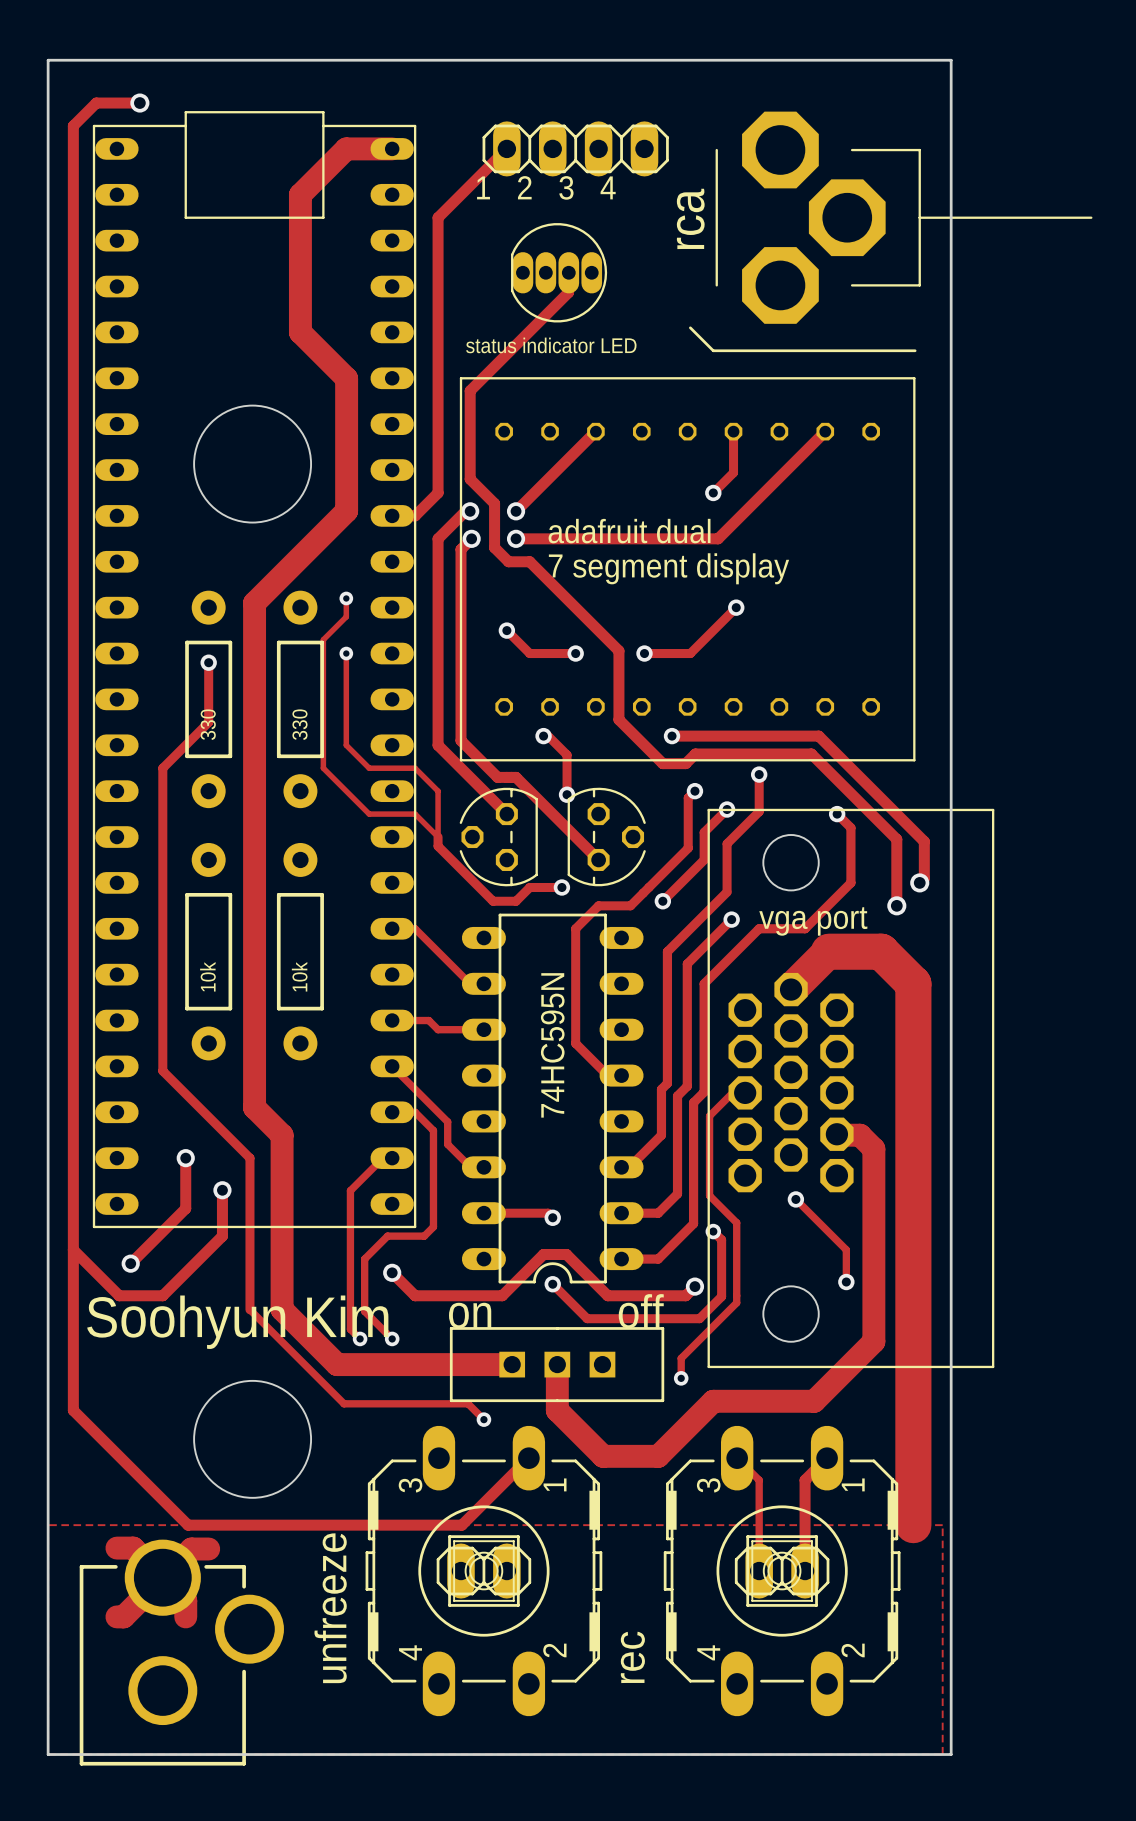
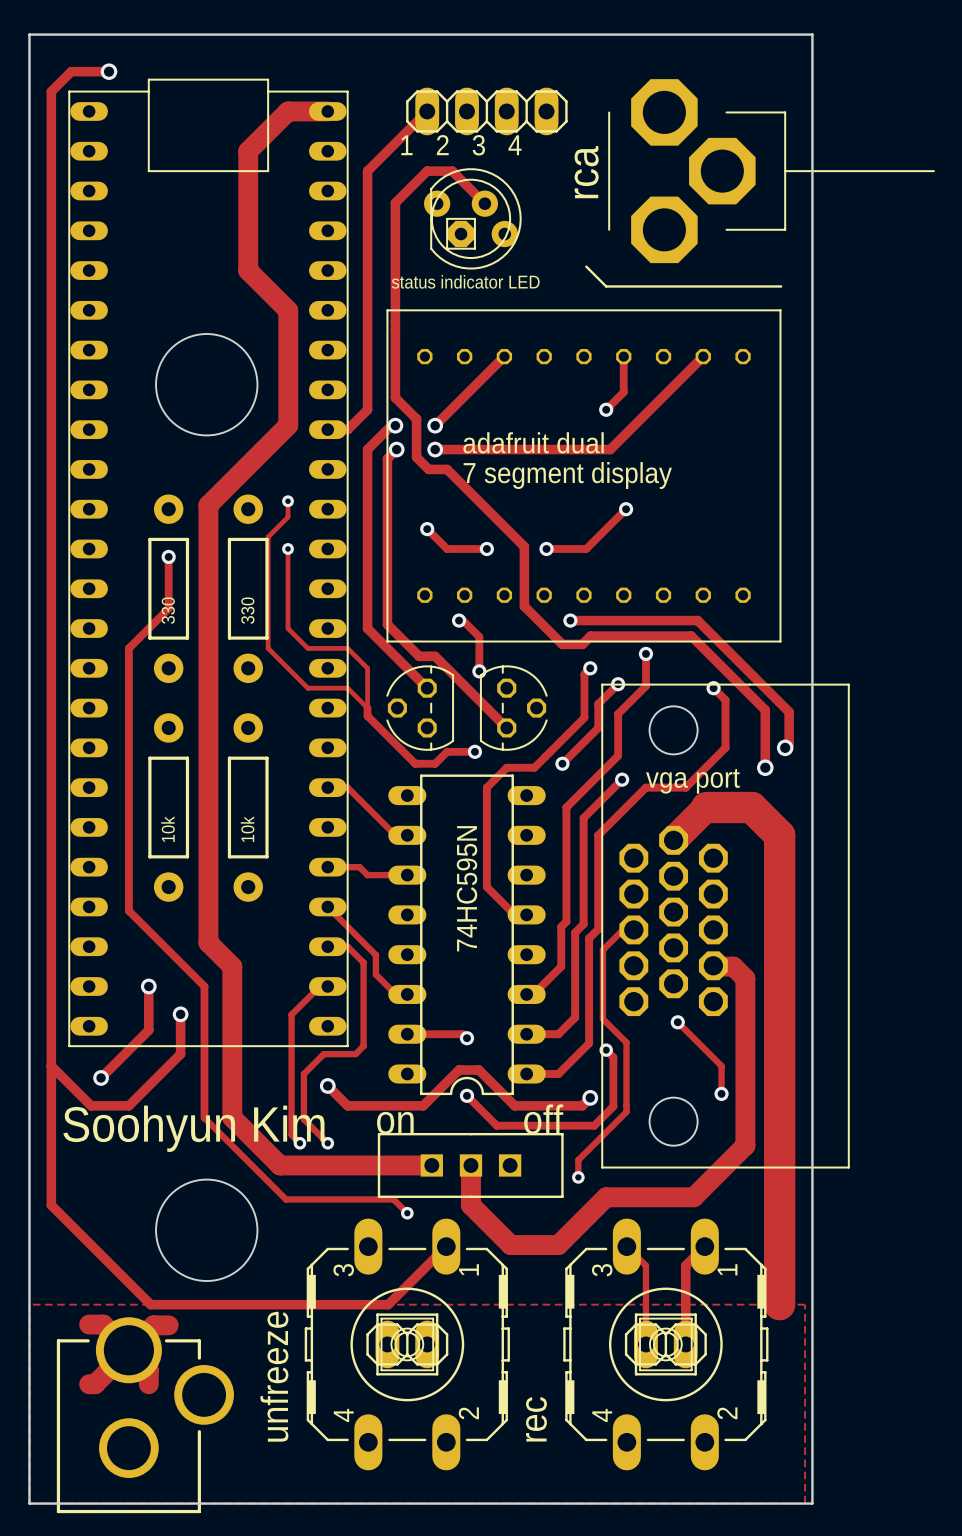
part footprint: [511, 223, 608, 323] -> [424, 168, 522, 270]
track: (568, 273) (568, 292) (470, 390) -> (484, 203) (452, 171) (427, 171) (395, 202) (395, 321)

